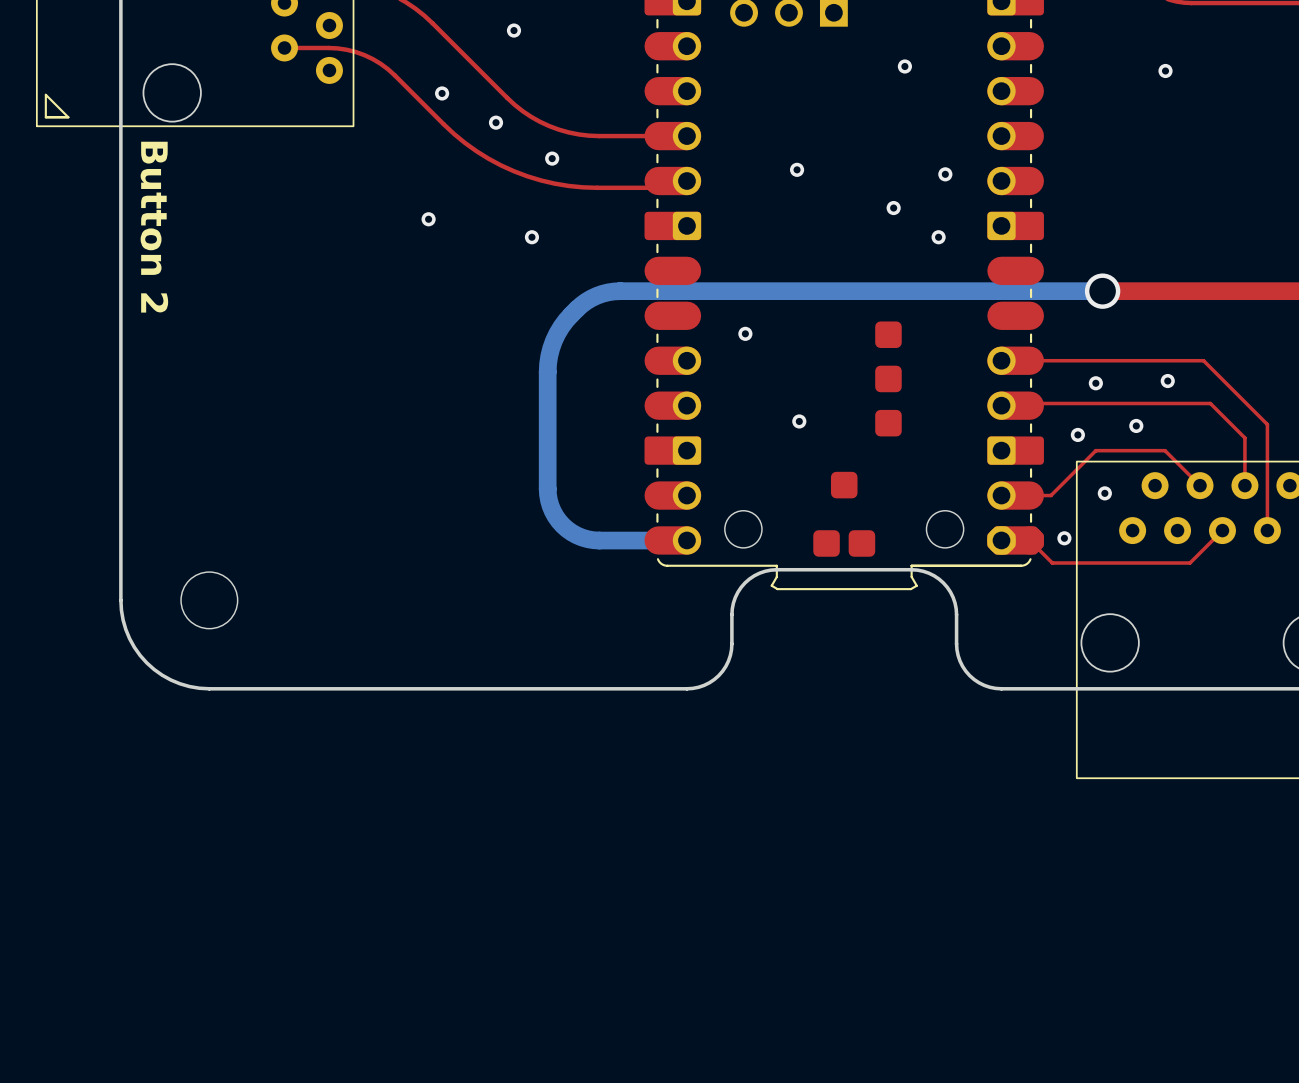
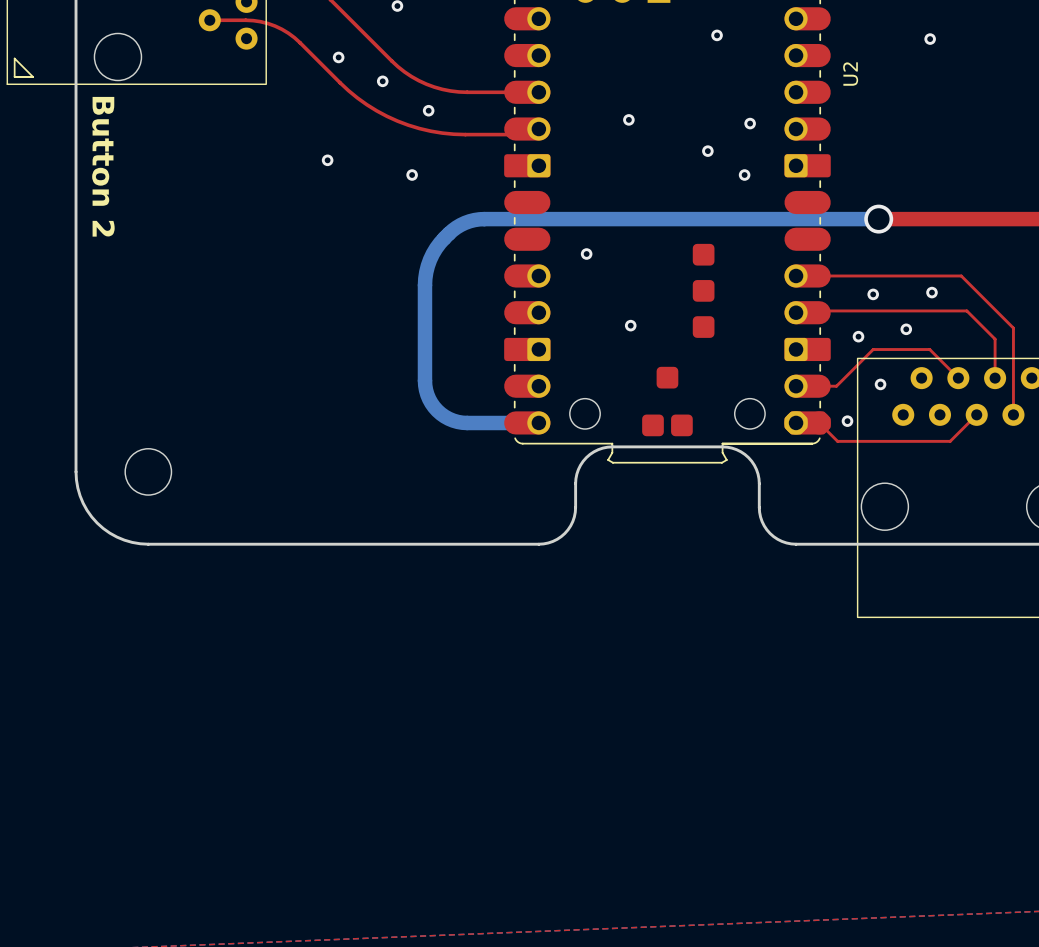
U2 name: none -> U2 (850, 74)

